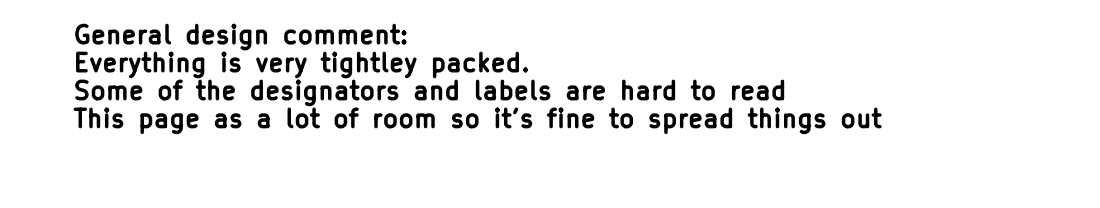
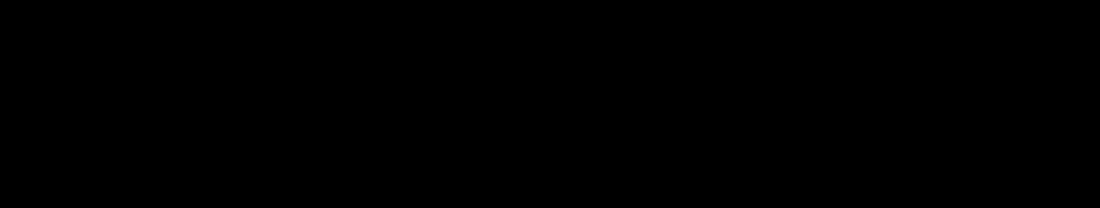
text: General design comment: (240, 37) -> none
text: Everything is very tightley packed. (302, 64) -> none
text: Some of the designators and labels are hard to read (429, 92) -> none
text: This page as a lot of room so it's fine to spread things out (477, 120) -> none

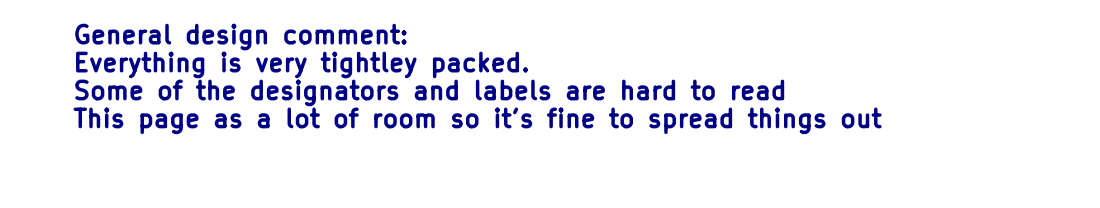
text: none -> General design comment: (240, 37)
text: none -> Everything is very tightley packed. (302, 64)
text: none -> Some of the designators and labels are hard to read (429, 92)
text: none -> This page as a lot of room so it's fine to spread things out (477, 120)

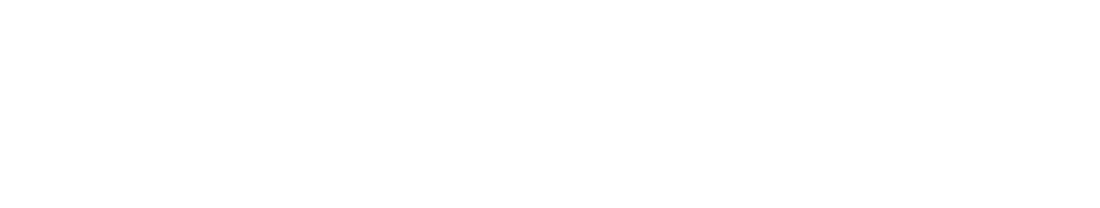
text: General design comment: (240, 37) -> none
text: Everything is very tightley packed. (302, 64) -> none
text: Some of the designators and labels are hard to read (429, 92) -> none
text: This page as a lot of room so it's fine to spread things out (477, 120) -> none

